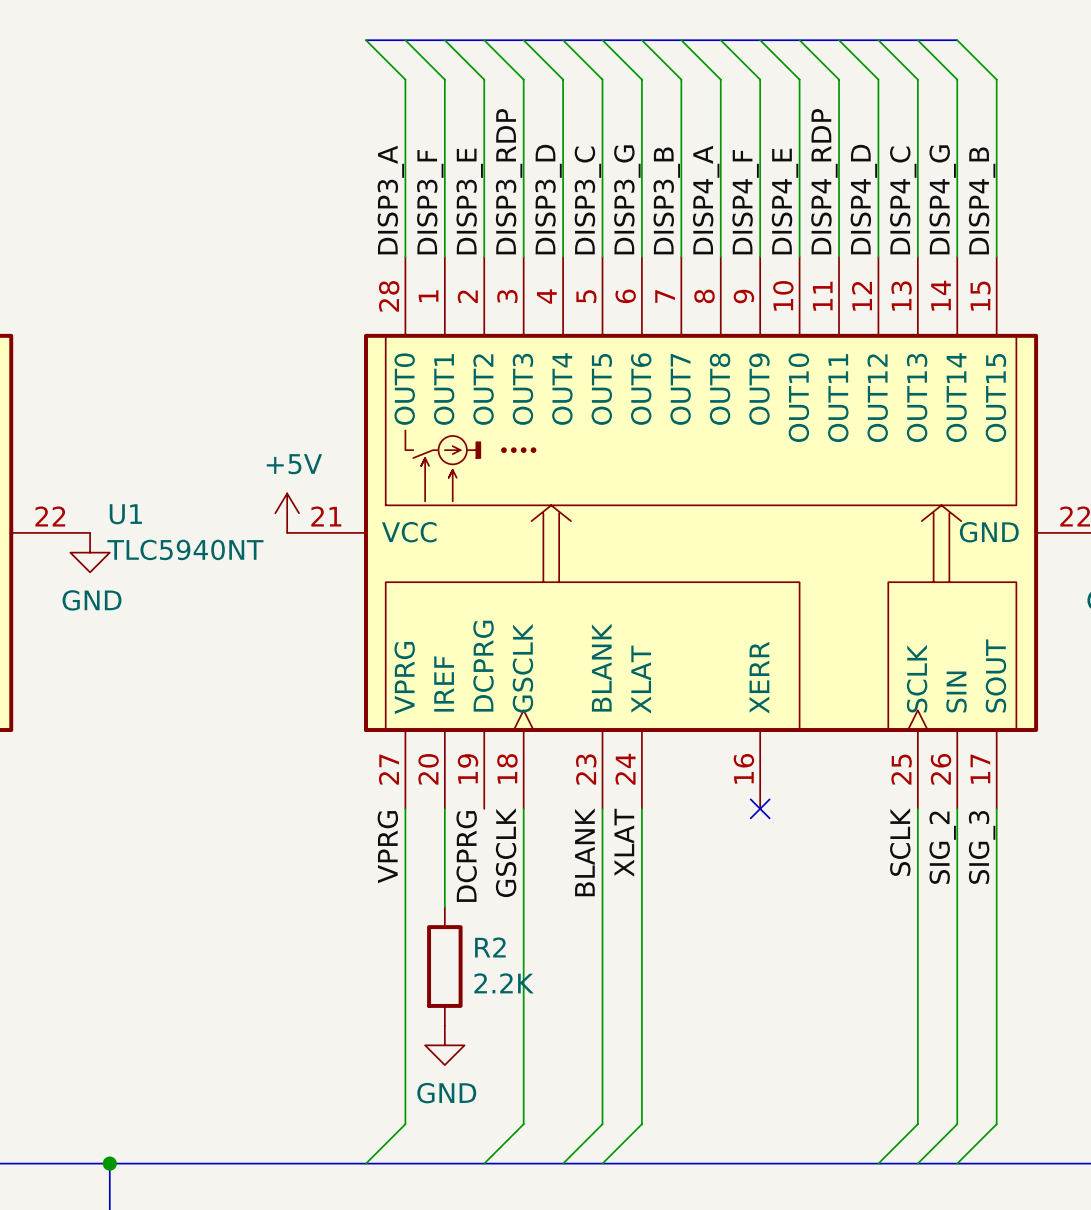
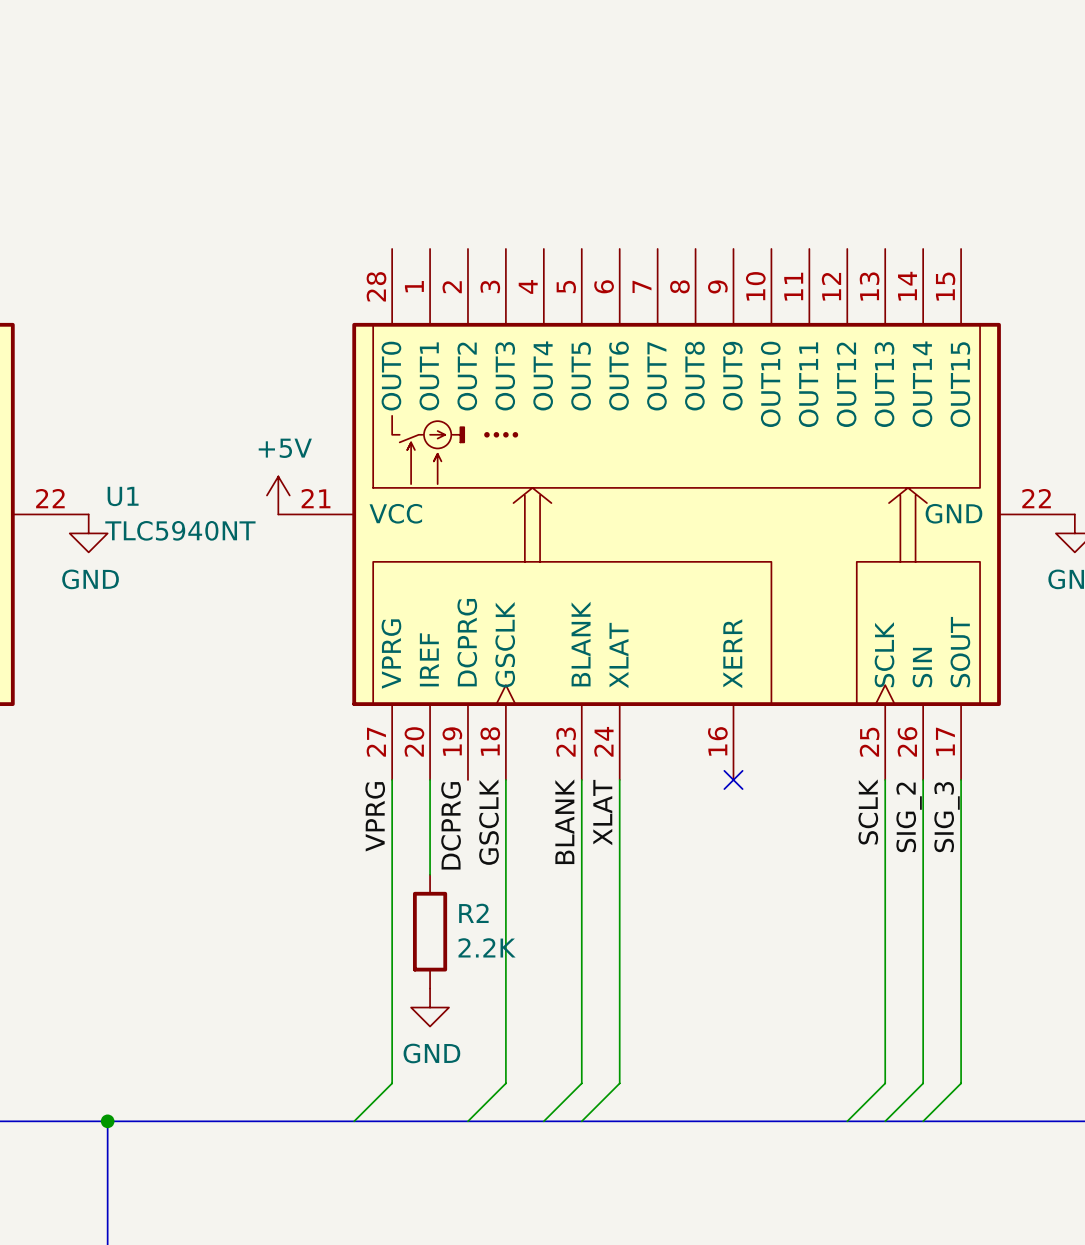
wire: (365, 40) (405, 79) (405, 257) -> none
bus: (365, 40) (957, 40) -> none
wire: (405, 40) (444, 79) (444, 257) -> none
wire: (444, 40) (484, 79) (484, 257) -> none
wire: (484, 40) (523, 79) (523, 257) -> none
wire: (523, 40) (563, 79) (563, 257) -> none
wire: (563, 40) (602, 79) (602, 257) -> none
wire: (602, 40) (641, 79) (641, 257) -> none
wire: (641, 40) (681, 79) (681, 257) -> none
wire: (681, 40) (720, 79) (720, 257) -> none
wire: (720, 40) (760, 79) (760, 257) -> none
wire: (760, 40) (799, 79) (799, 257) -> none
wire: (799, 40) (839, 79) (839, 257) -> none
wire: (839, 40) (878, 79) (878, 257) -> none
wire: (878, 40) (917, 79) (917, 257) -> none
wire: (917, 40) (957, 79) (957, 257) -> none
wire: (957, 40) (996, 79) (996, 257) -> none
label: DISP3_RDP (509, 181) -> none
label: DISP4_RDP (824, 181) -> none
label: DISP3_D (548, 199) -> none
label: DISP3_G (627, 199) -> none
label: DISP4_D (863, 199) -> none
label: DISP4_G (942, 199) -> none
label: DISP3_A (390, 200) -> none
label: DISP3_C (587, 200) -> none
label: DISP3_B (666, 200) -> none
label: DISP4_A (706, 200) -> none
label: DISP4_C (903, 200) -> none
label: DISP4_B (982, 200) -> none
label: DISP3_E (469, 201) -> none
label: DISP4_E (785, 201) -> none
label: DISP3_F (430, 202) -> none
label: DISP4_F (745, 202) -> none

